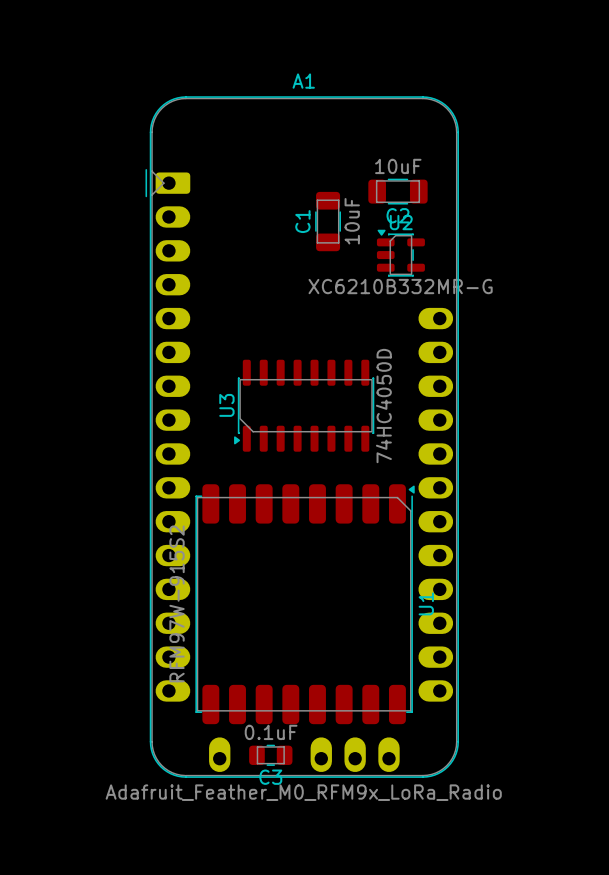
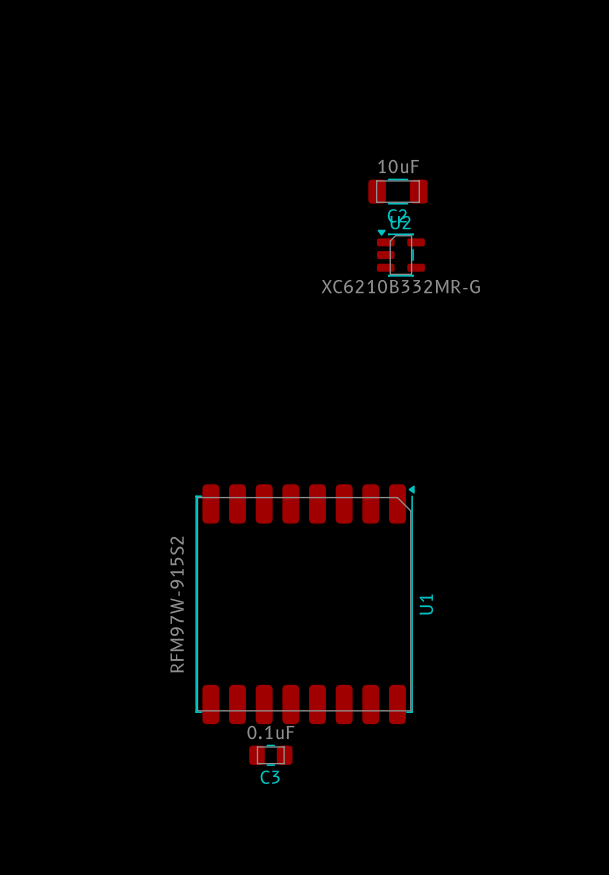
C1: 10uF (328, 221) -> none
U3: 74HC4050D (304, 405) -> none
A1: Adafruit_Feather_M0_RFM9x_LoRa_Radio (302, 437) -> none

